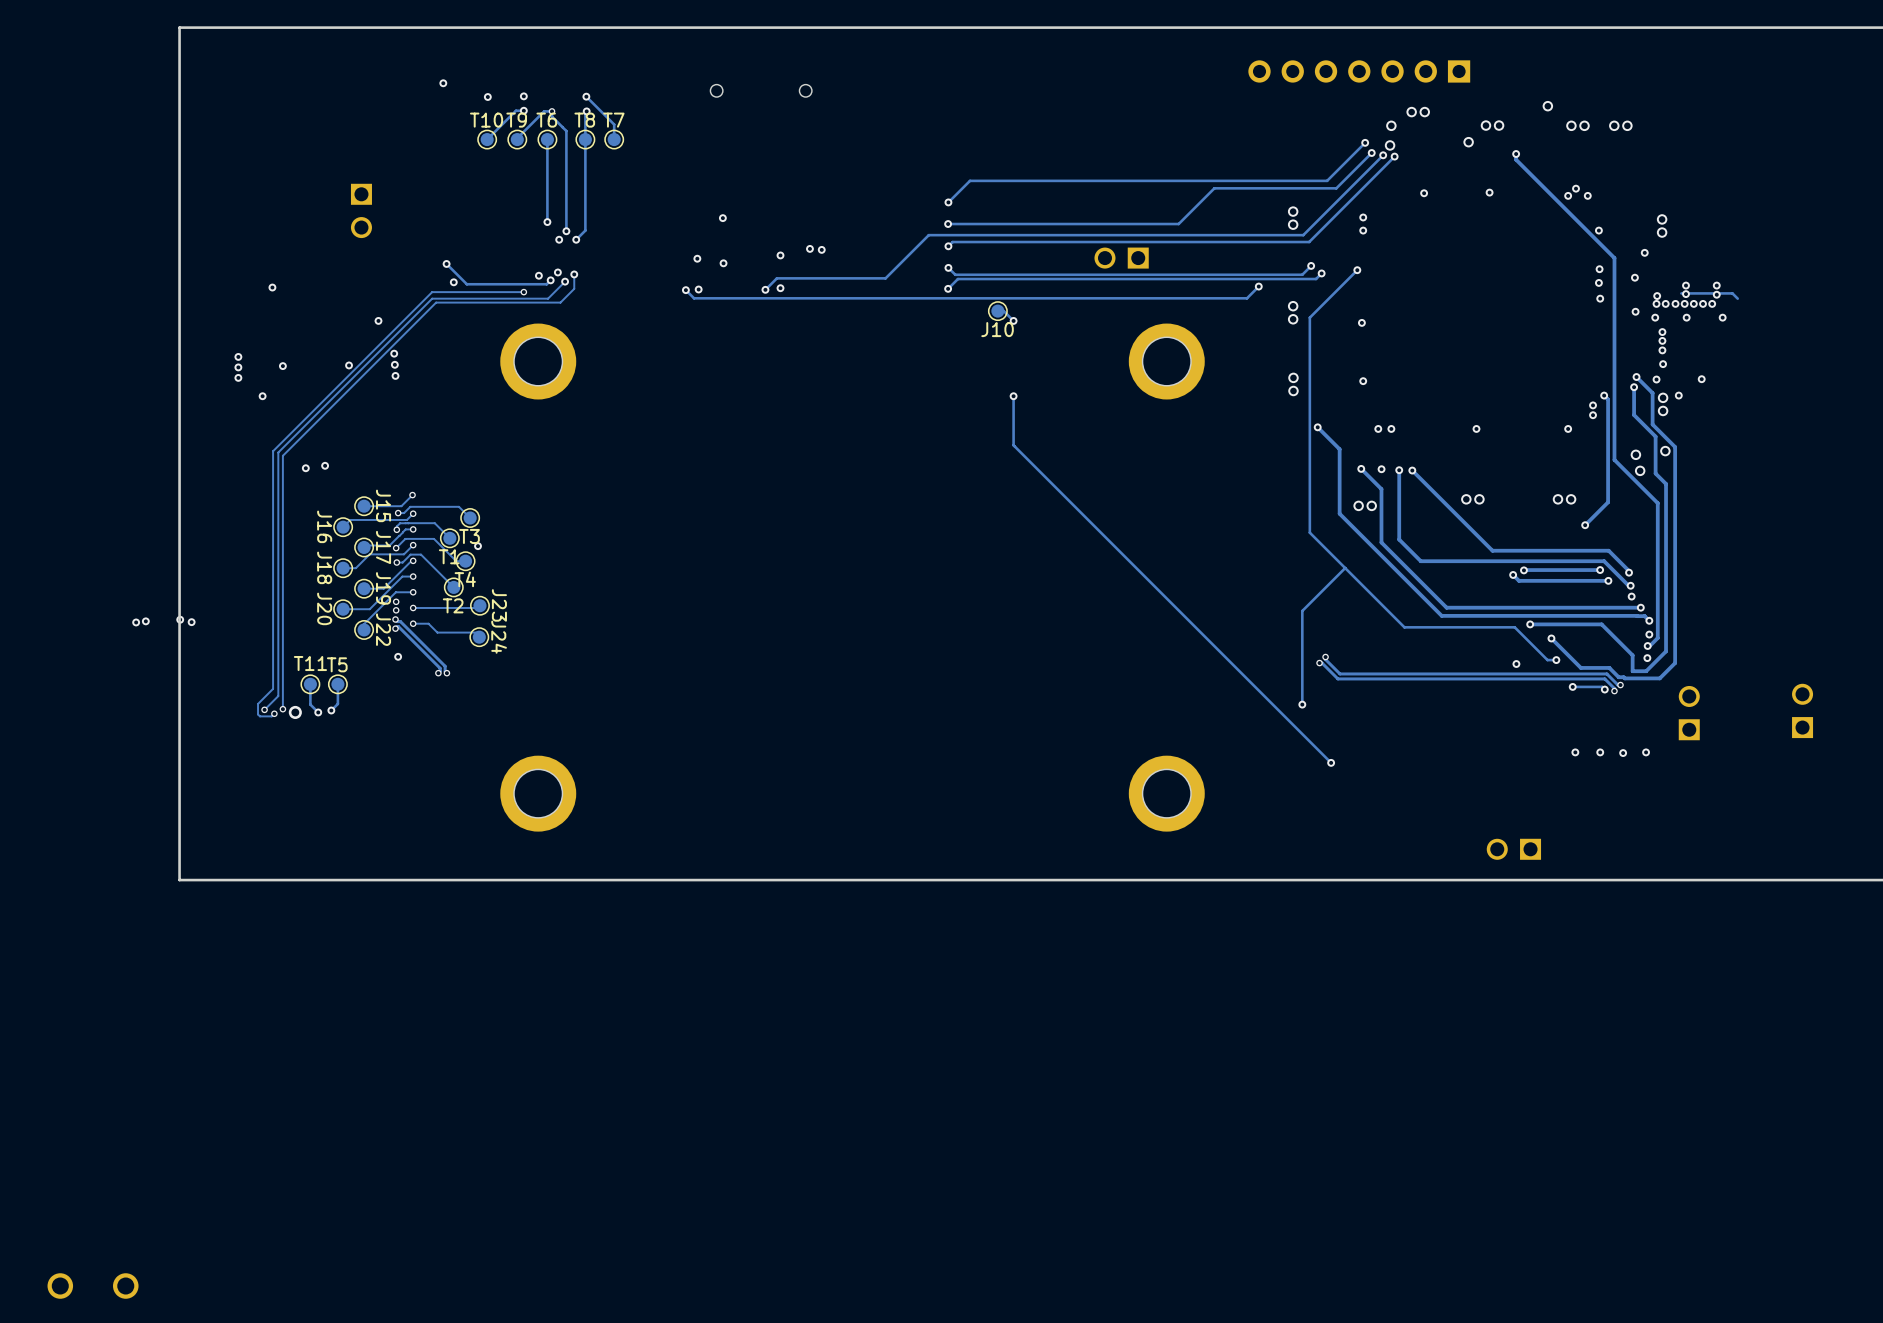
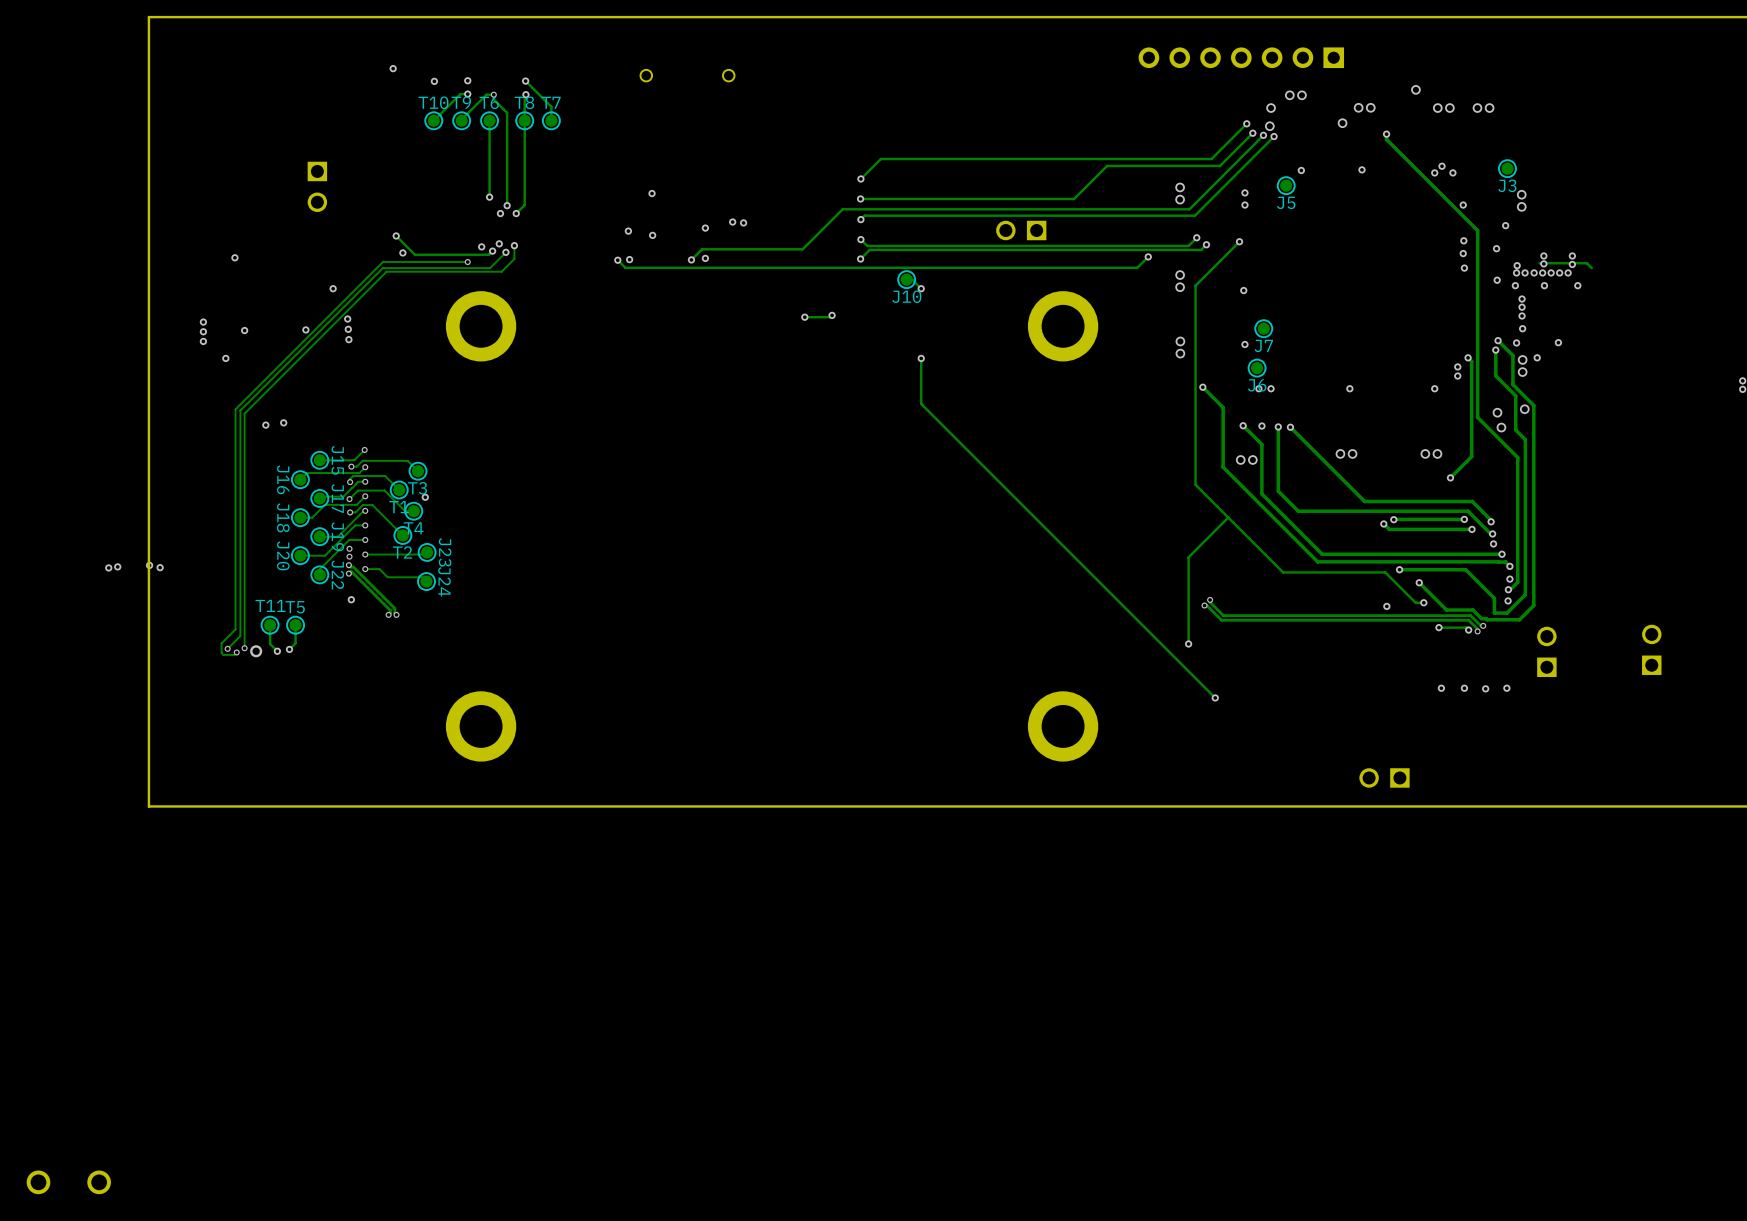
J3: none -> (1507, 168)
J5: none -> (1286, 185)
track: none -> (832, 315) (830, 317) (804, 317)
via: none -> (832, 315)
via: none -> (804, 317)
J7: none -> (1263, 328)
J6: none -> (1257, 368)

